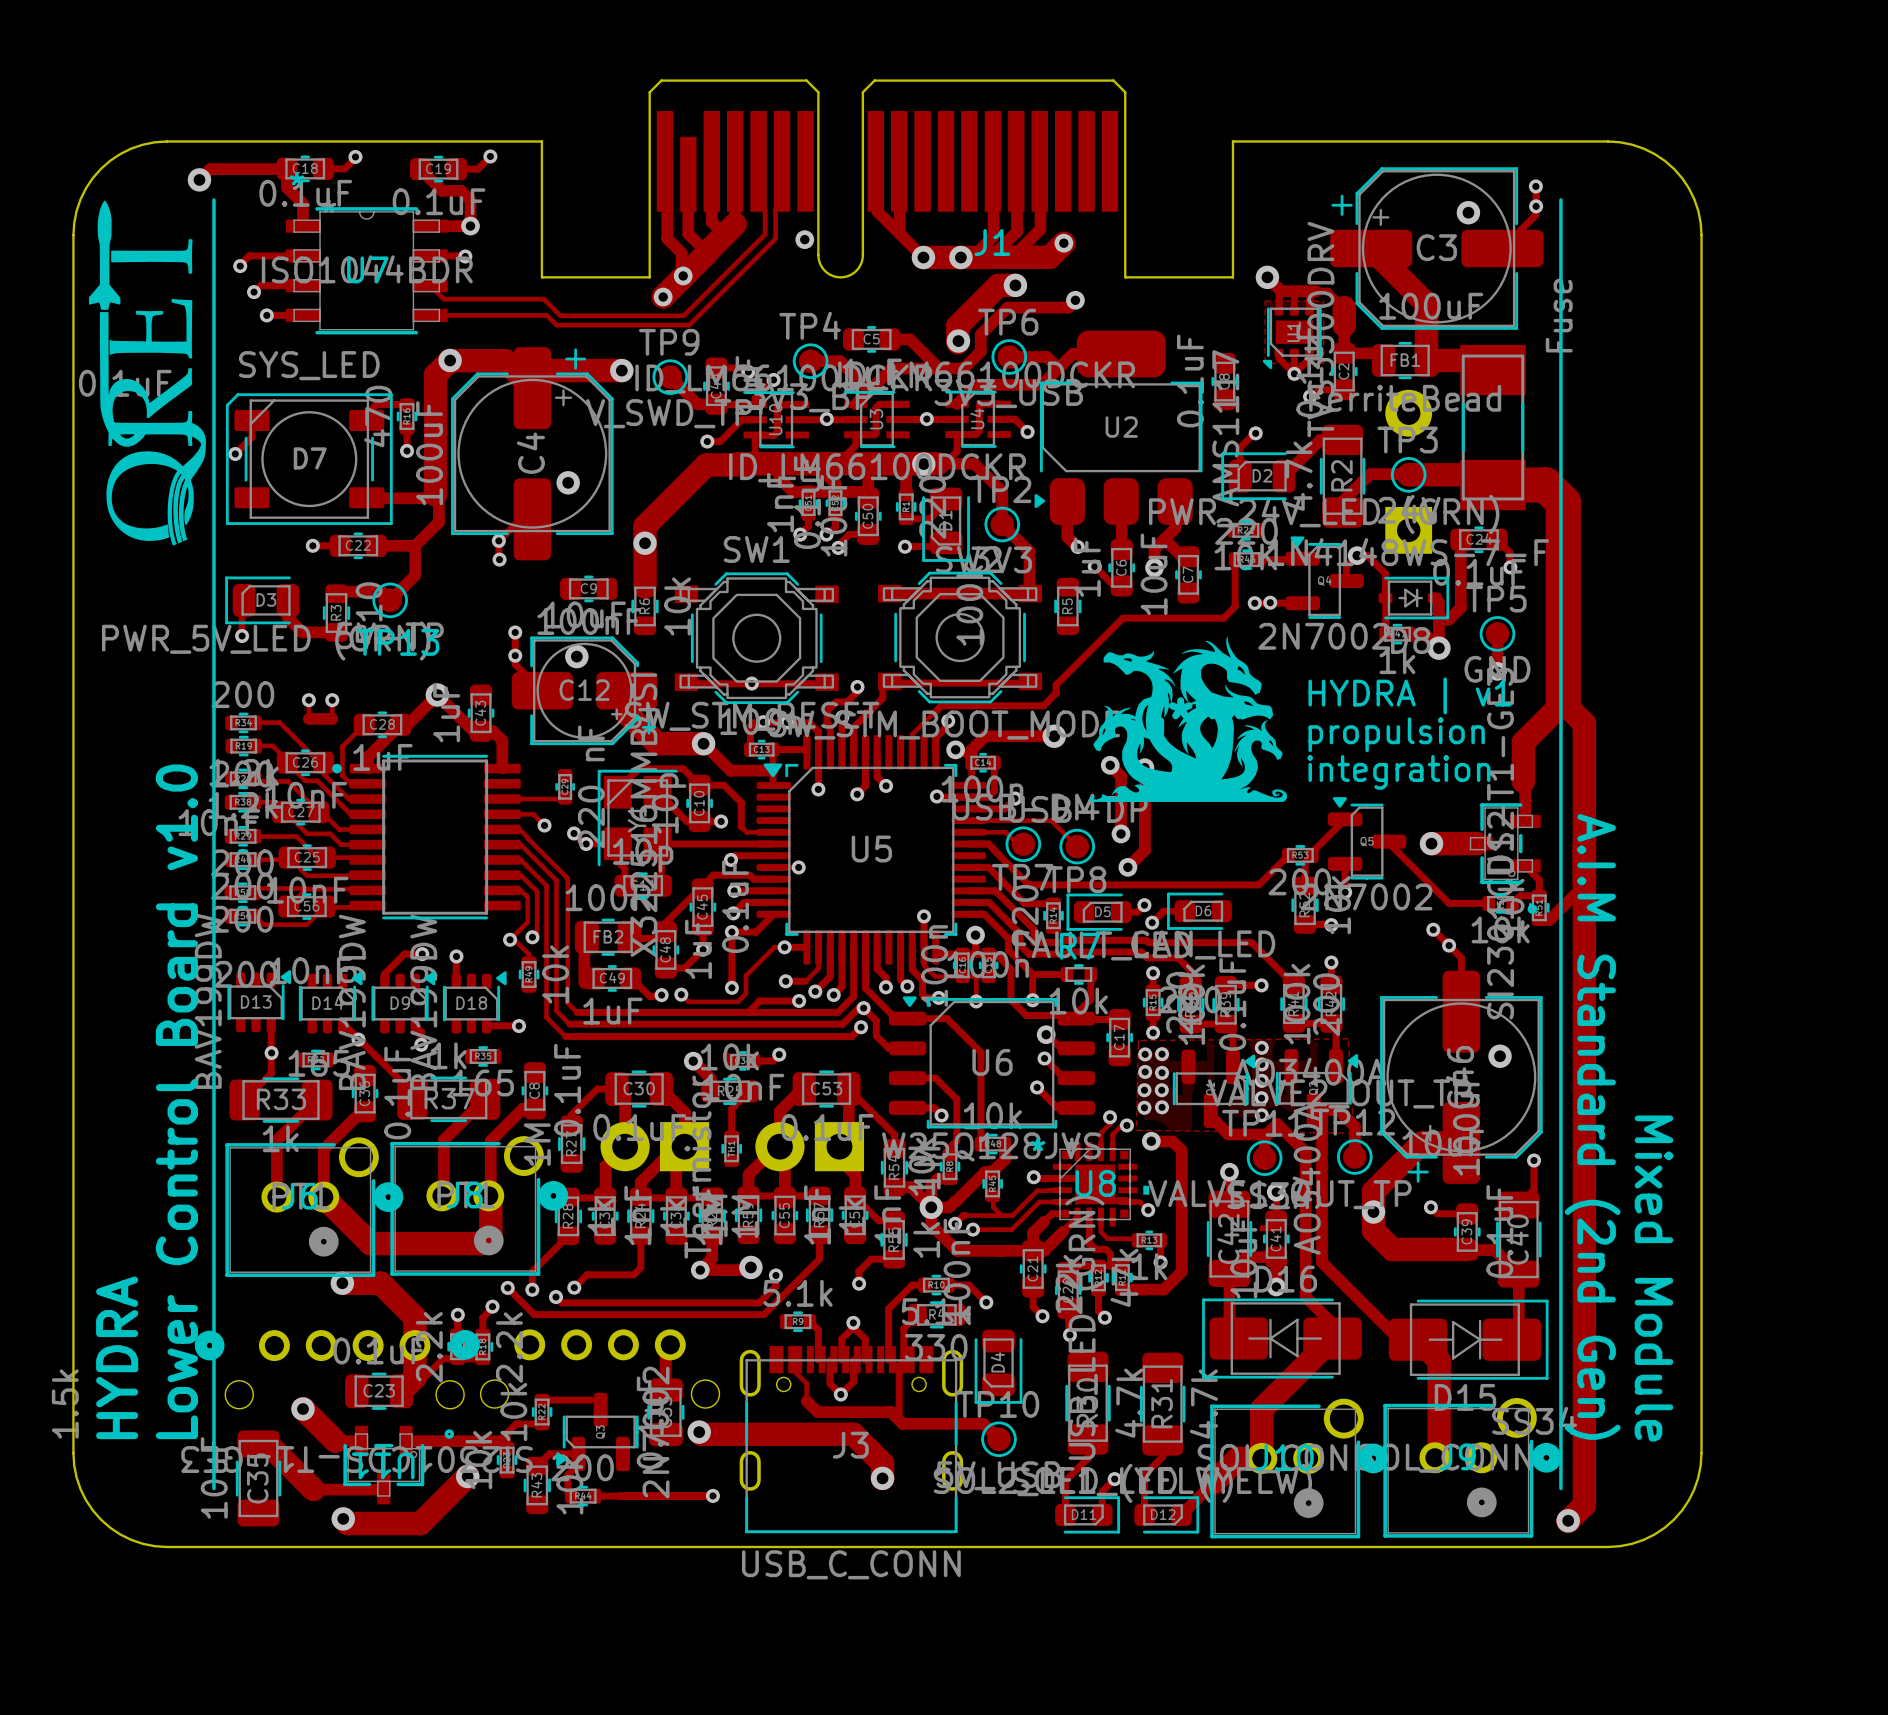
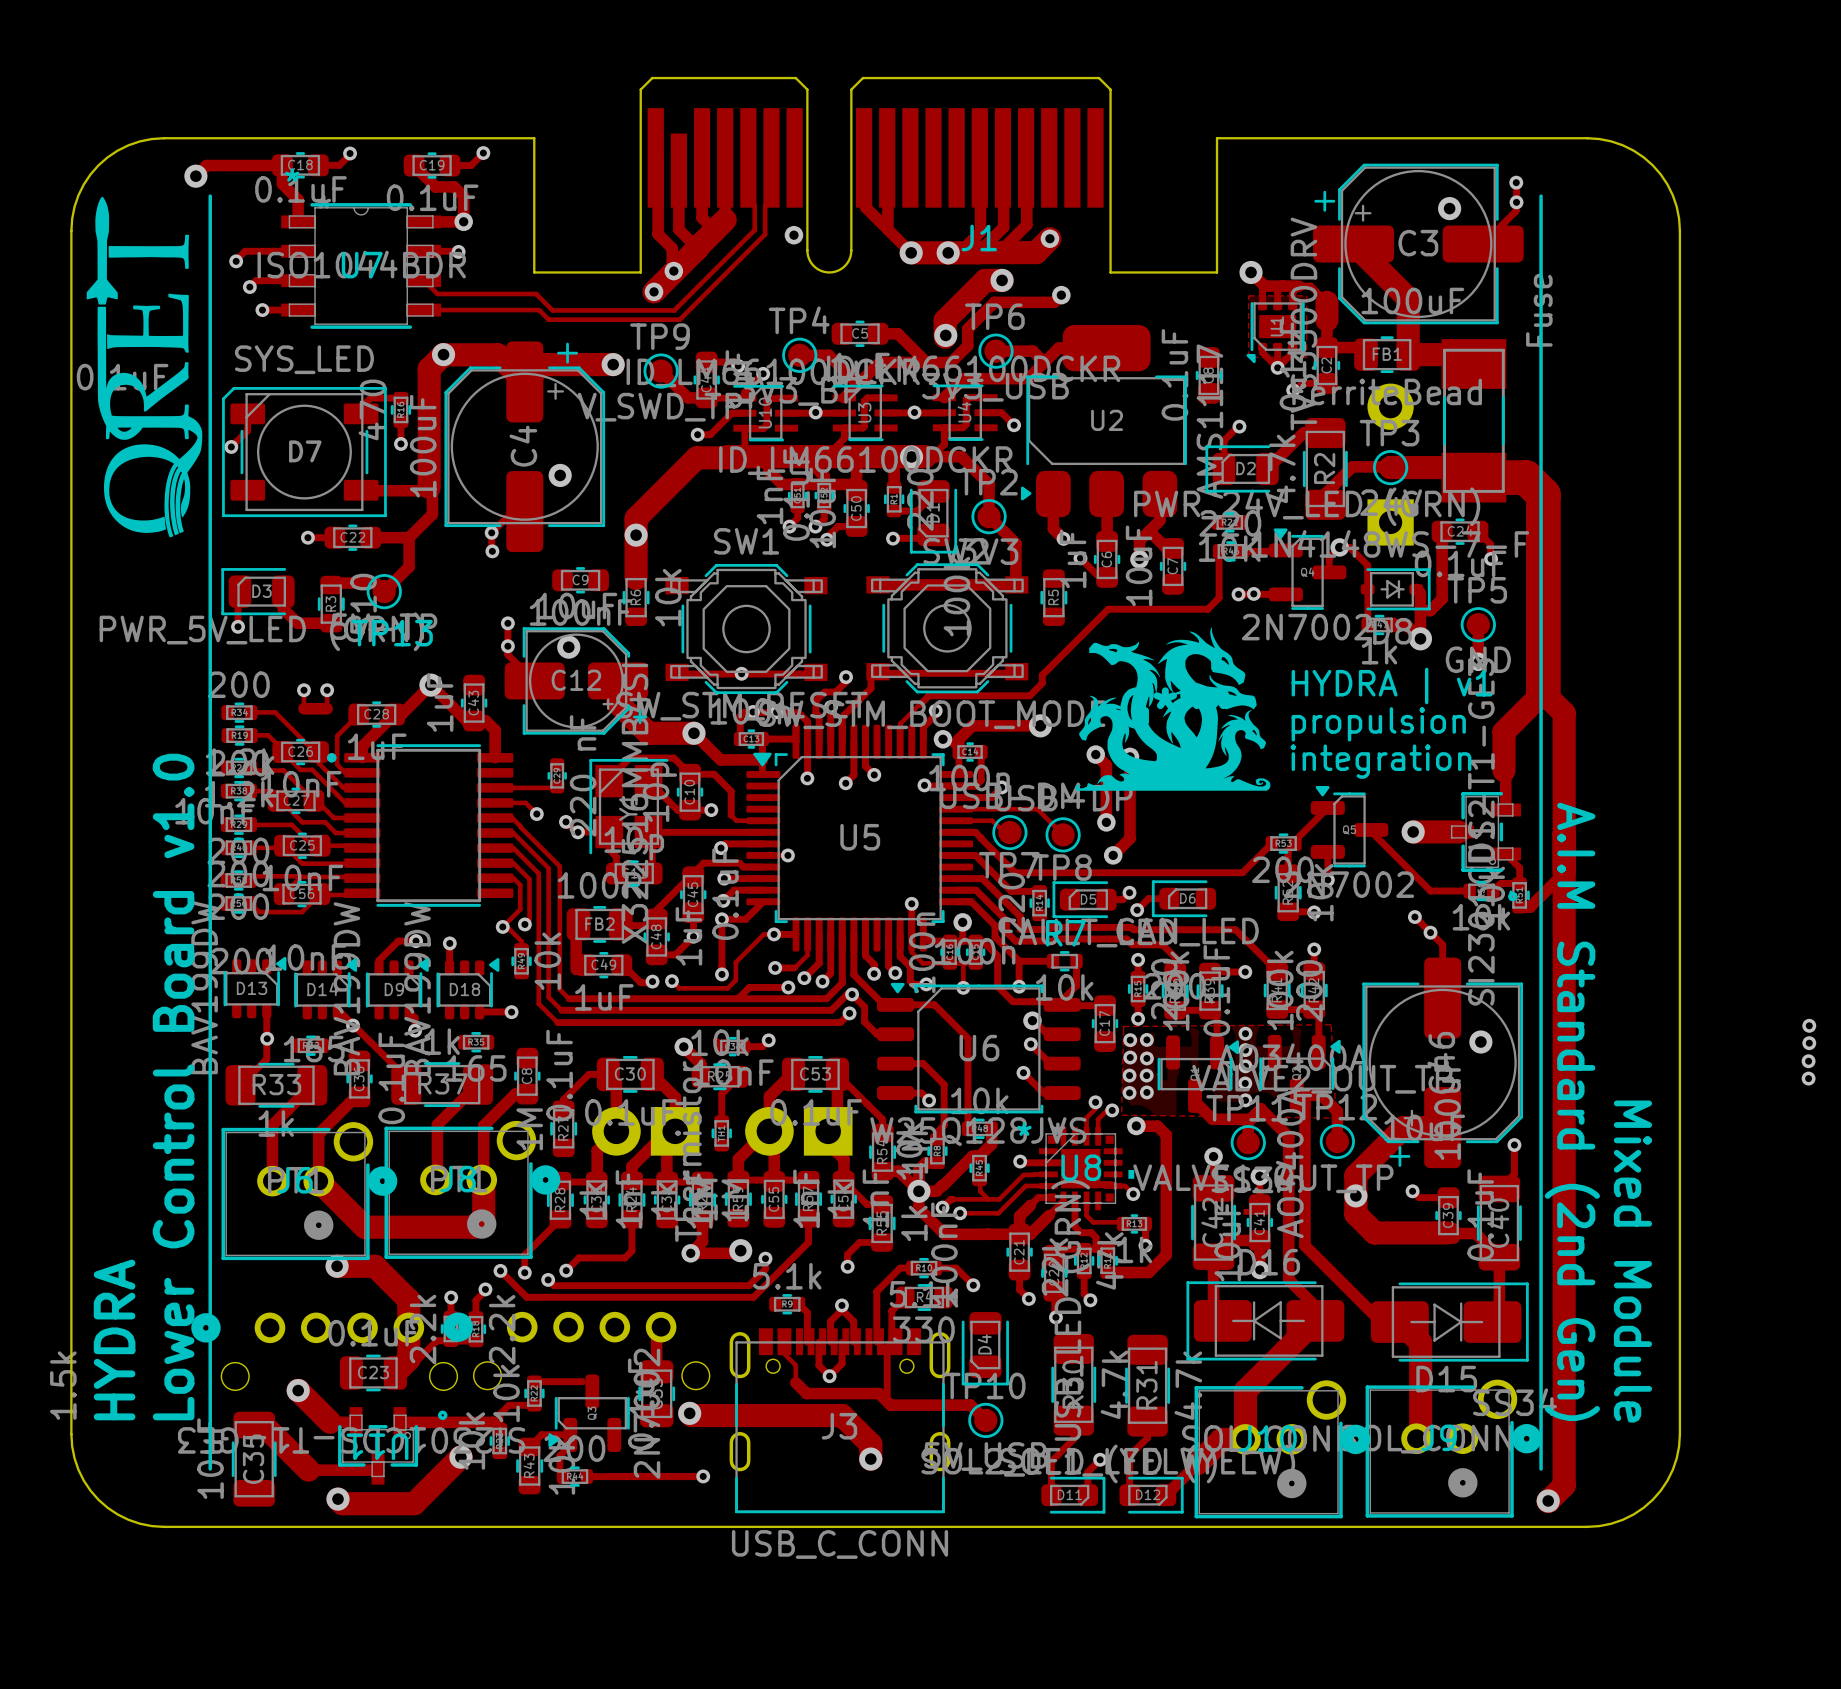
via: none -> (1809, 1025)
via: none -> (1809, 1043)
via: none -> (1808, 1061)
via: none -> (1808, 1078)

